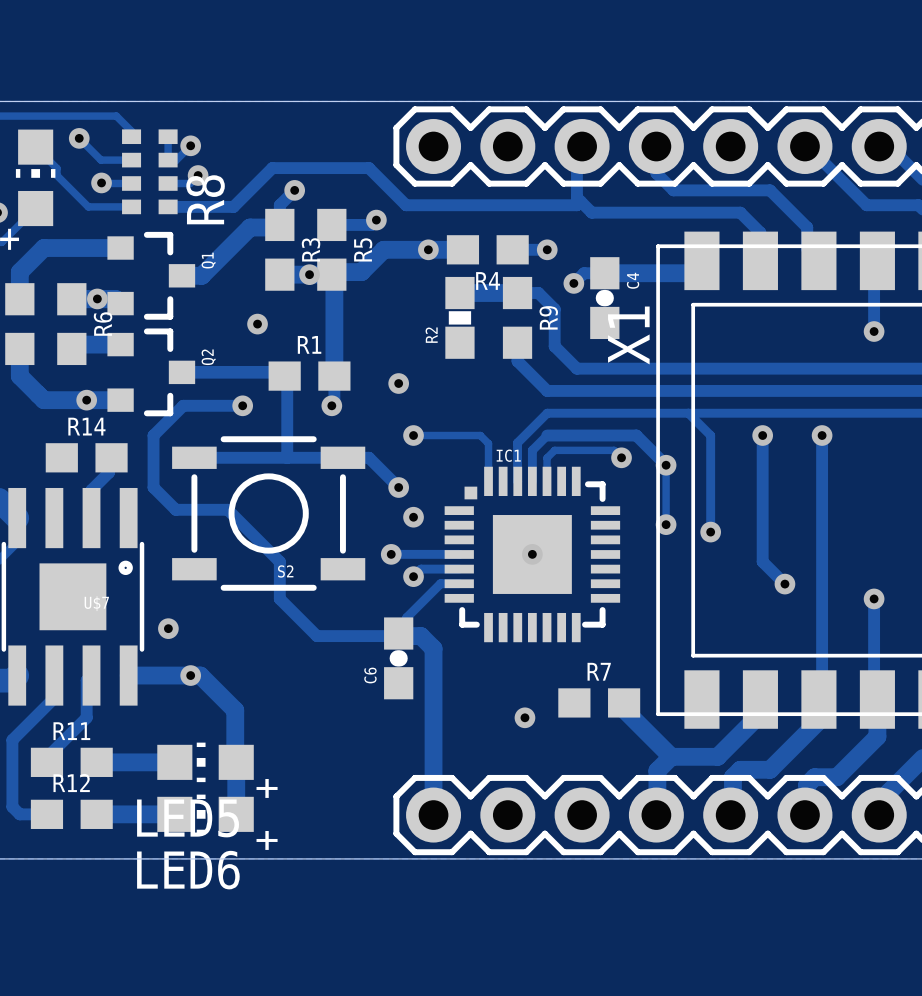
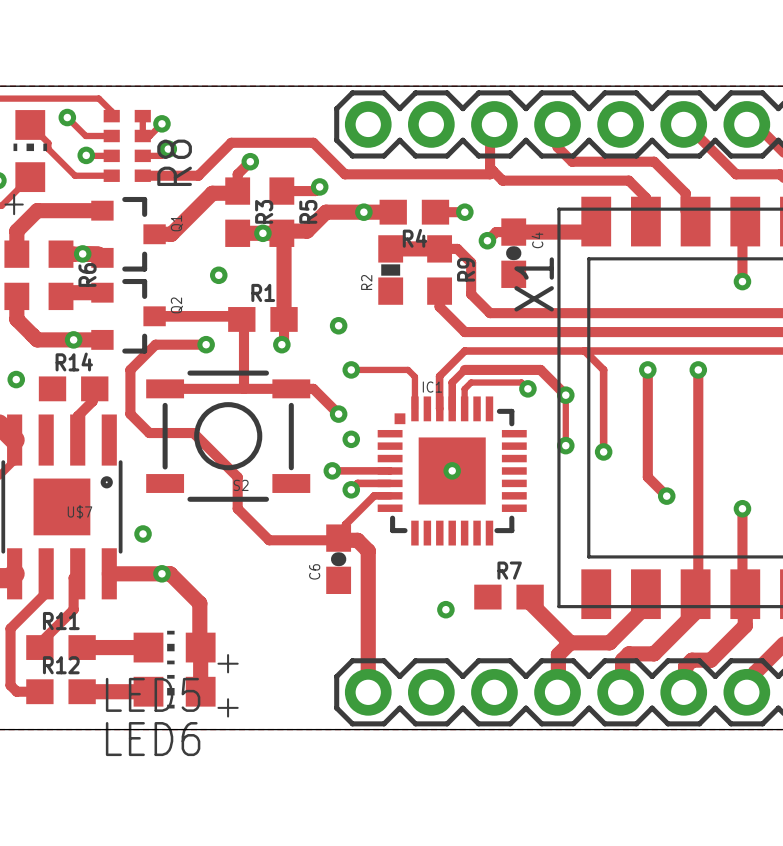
via: none -> (16, 379)

